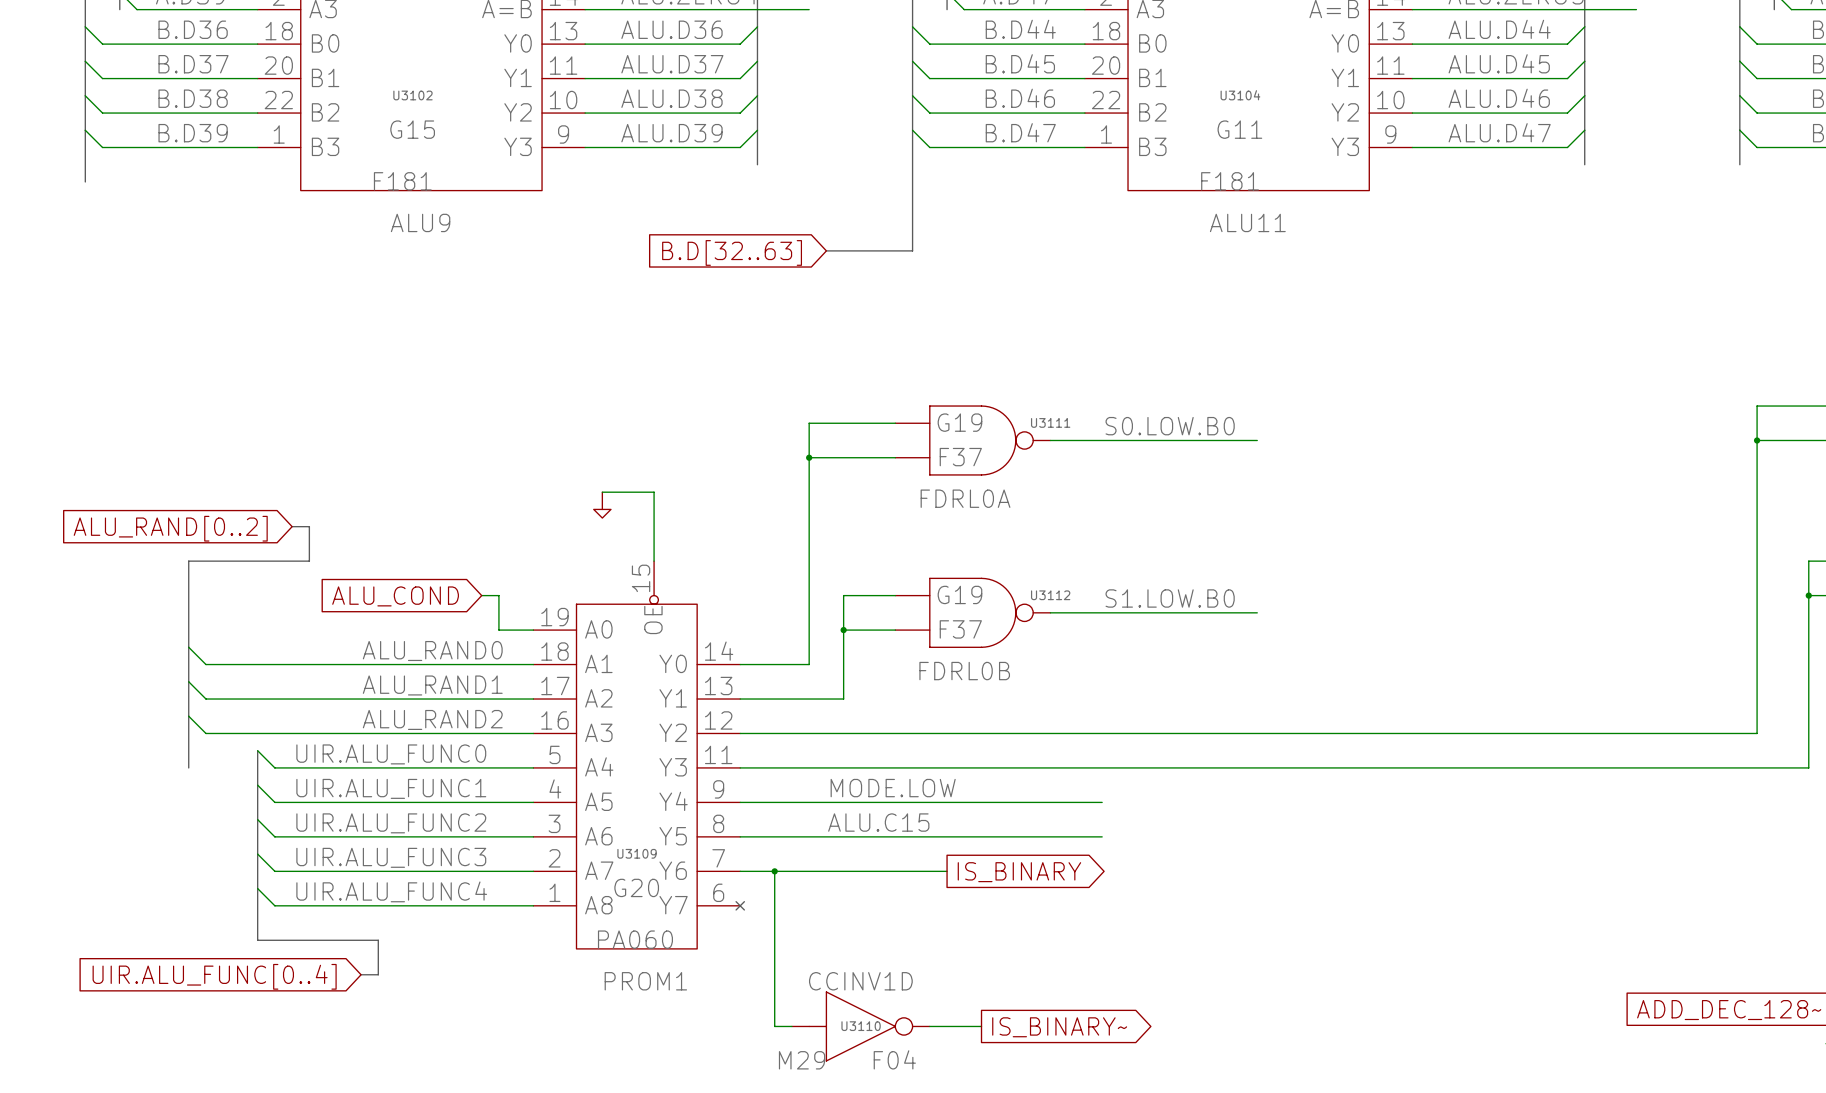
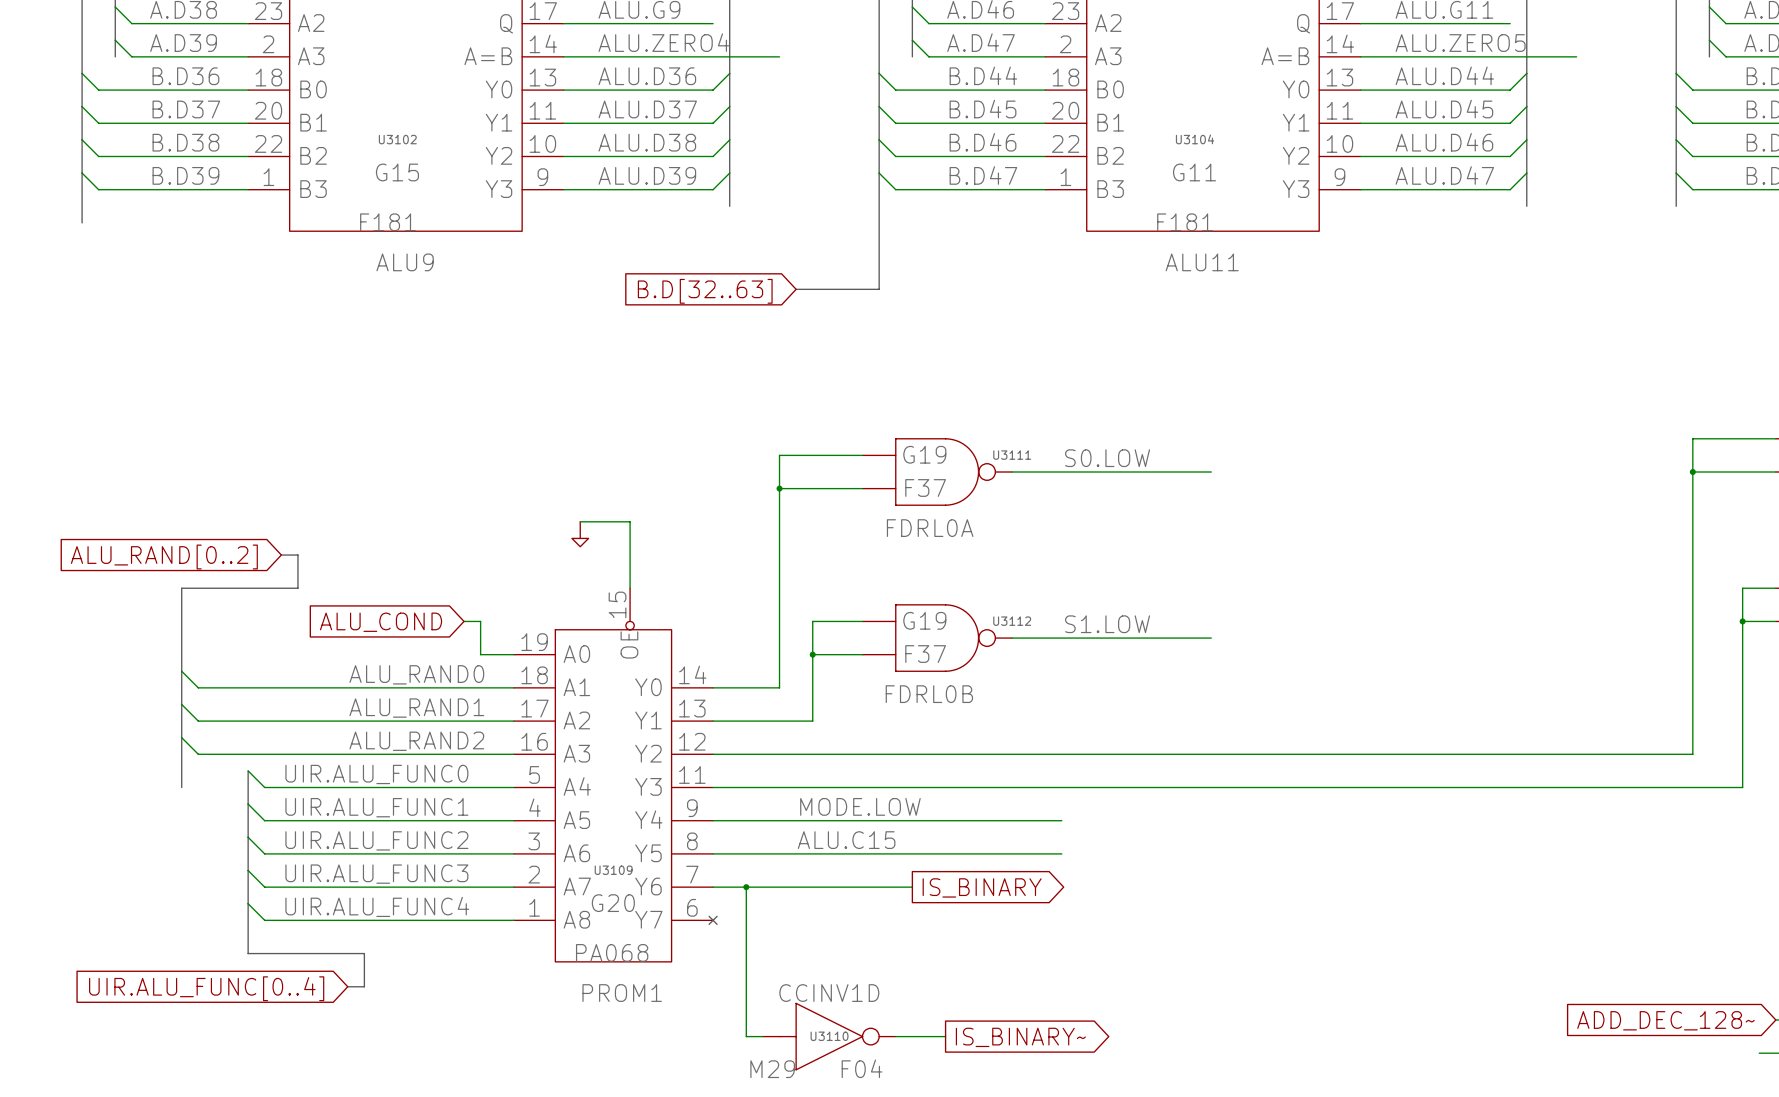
label: S0.LOW.B0 (1170, 426) -> S0.LOW (1107, 458)
label: S1.LOW.B0 (1170, 598) -> S1.LOW (1107, 624)
U3109 value: PA060 (635, 939) -> PA068 (612, 952)

